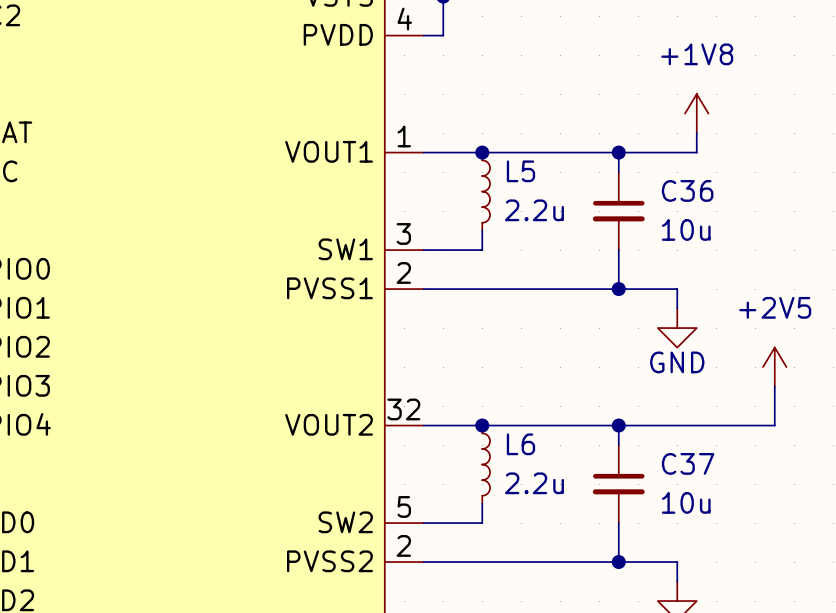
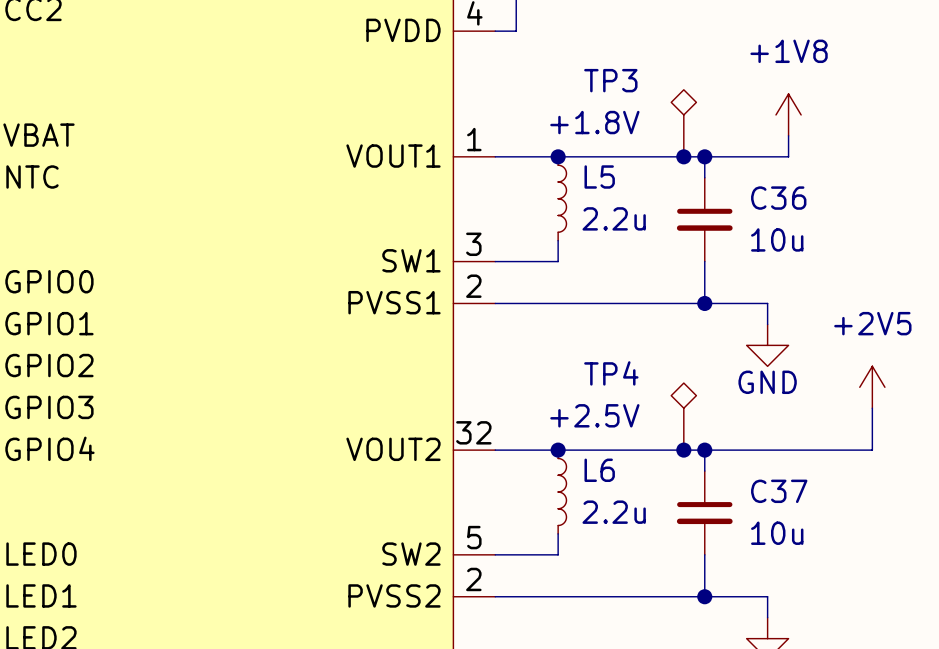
TP3: none -> +1.8V (683, 123)
junction: none -> (683, 156)
TP4: none -> +2.5V (683, 416)
junction: none -> (683, 450)

